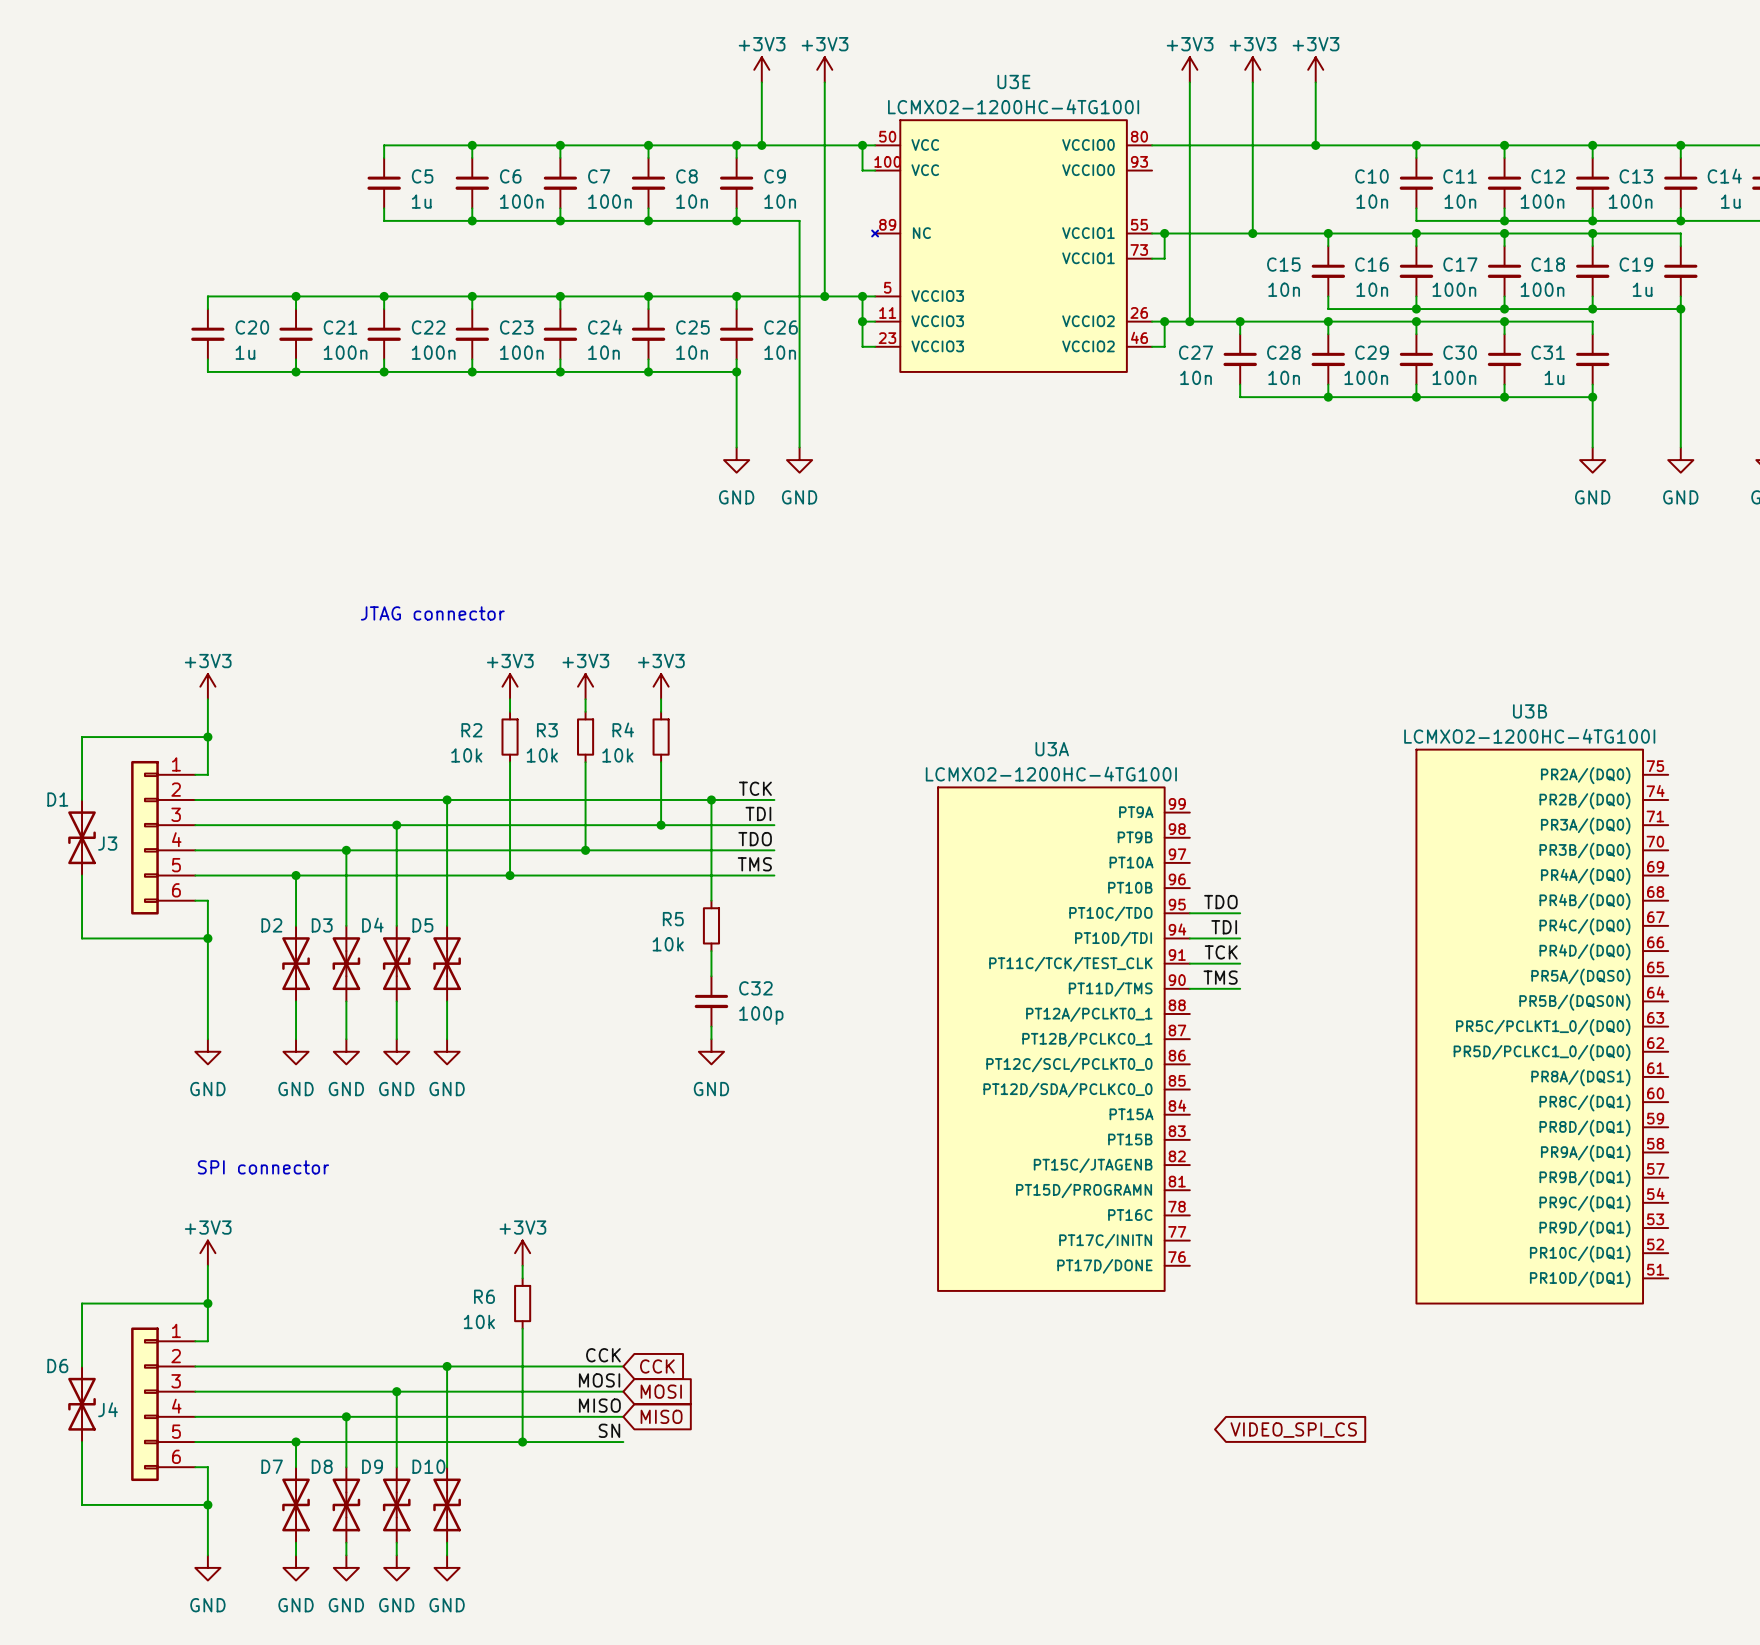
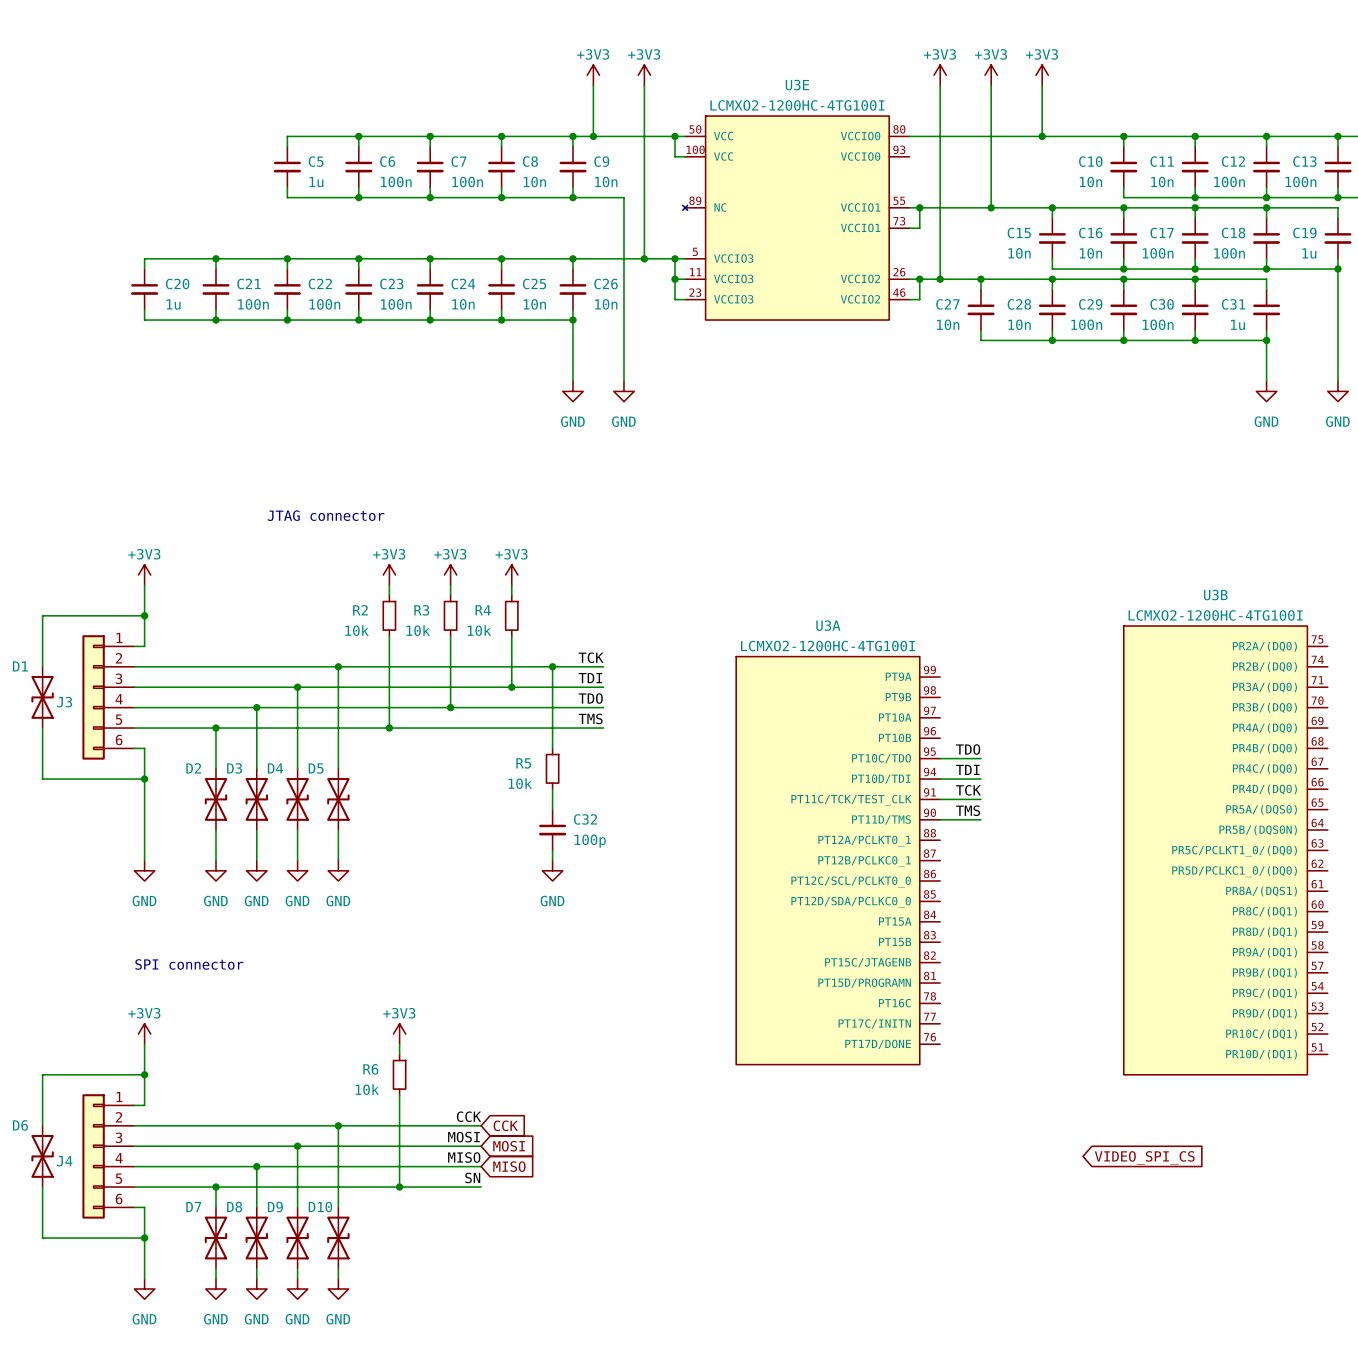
global label position: VIDEO_SPI_CS (1293, 1430) -> VIDEO_SPI_CS (1144, 1157)

